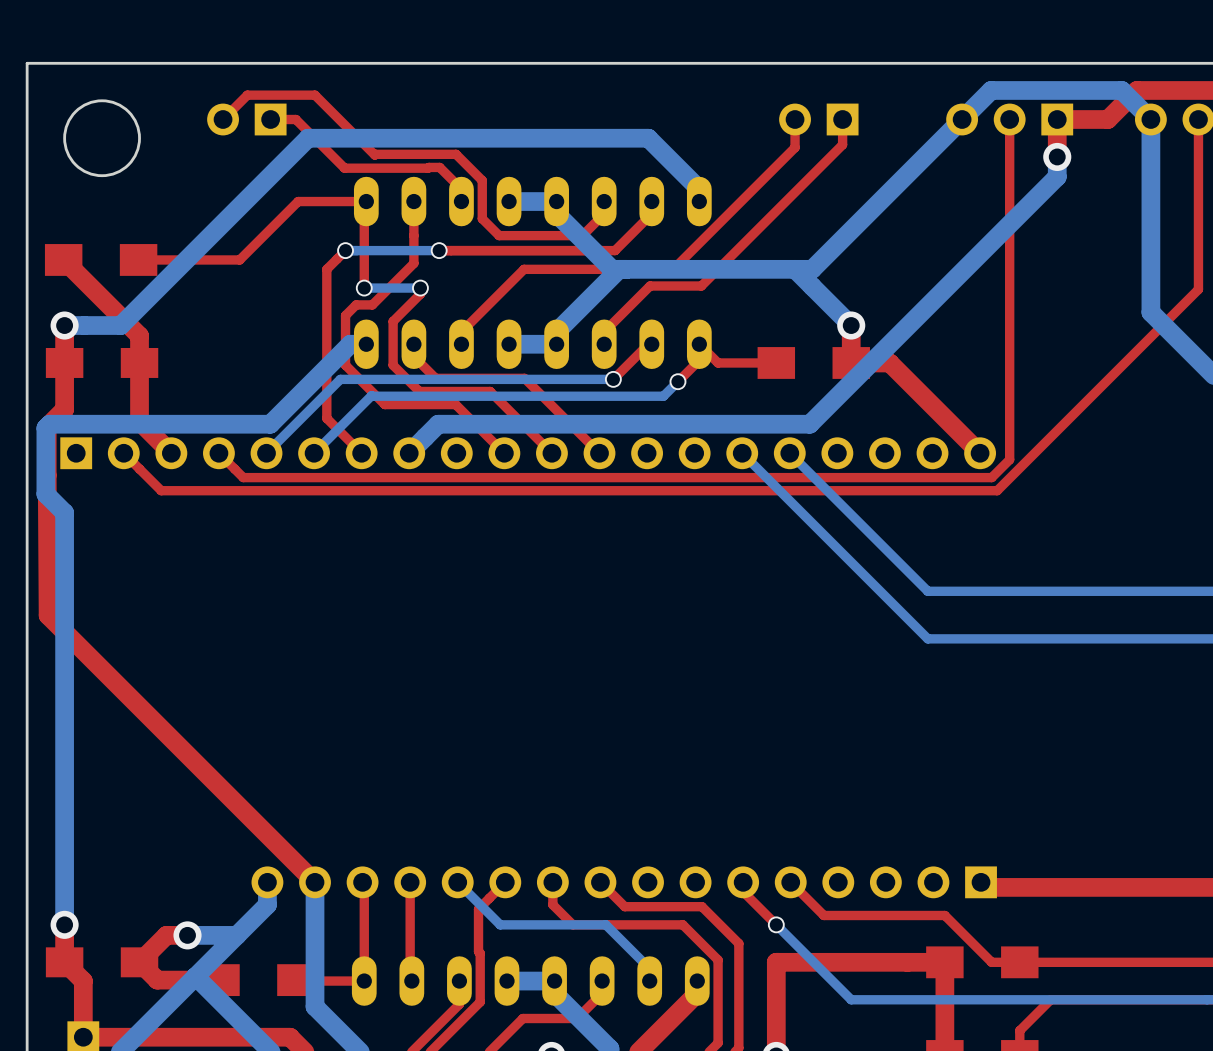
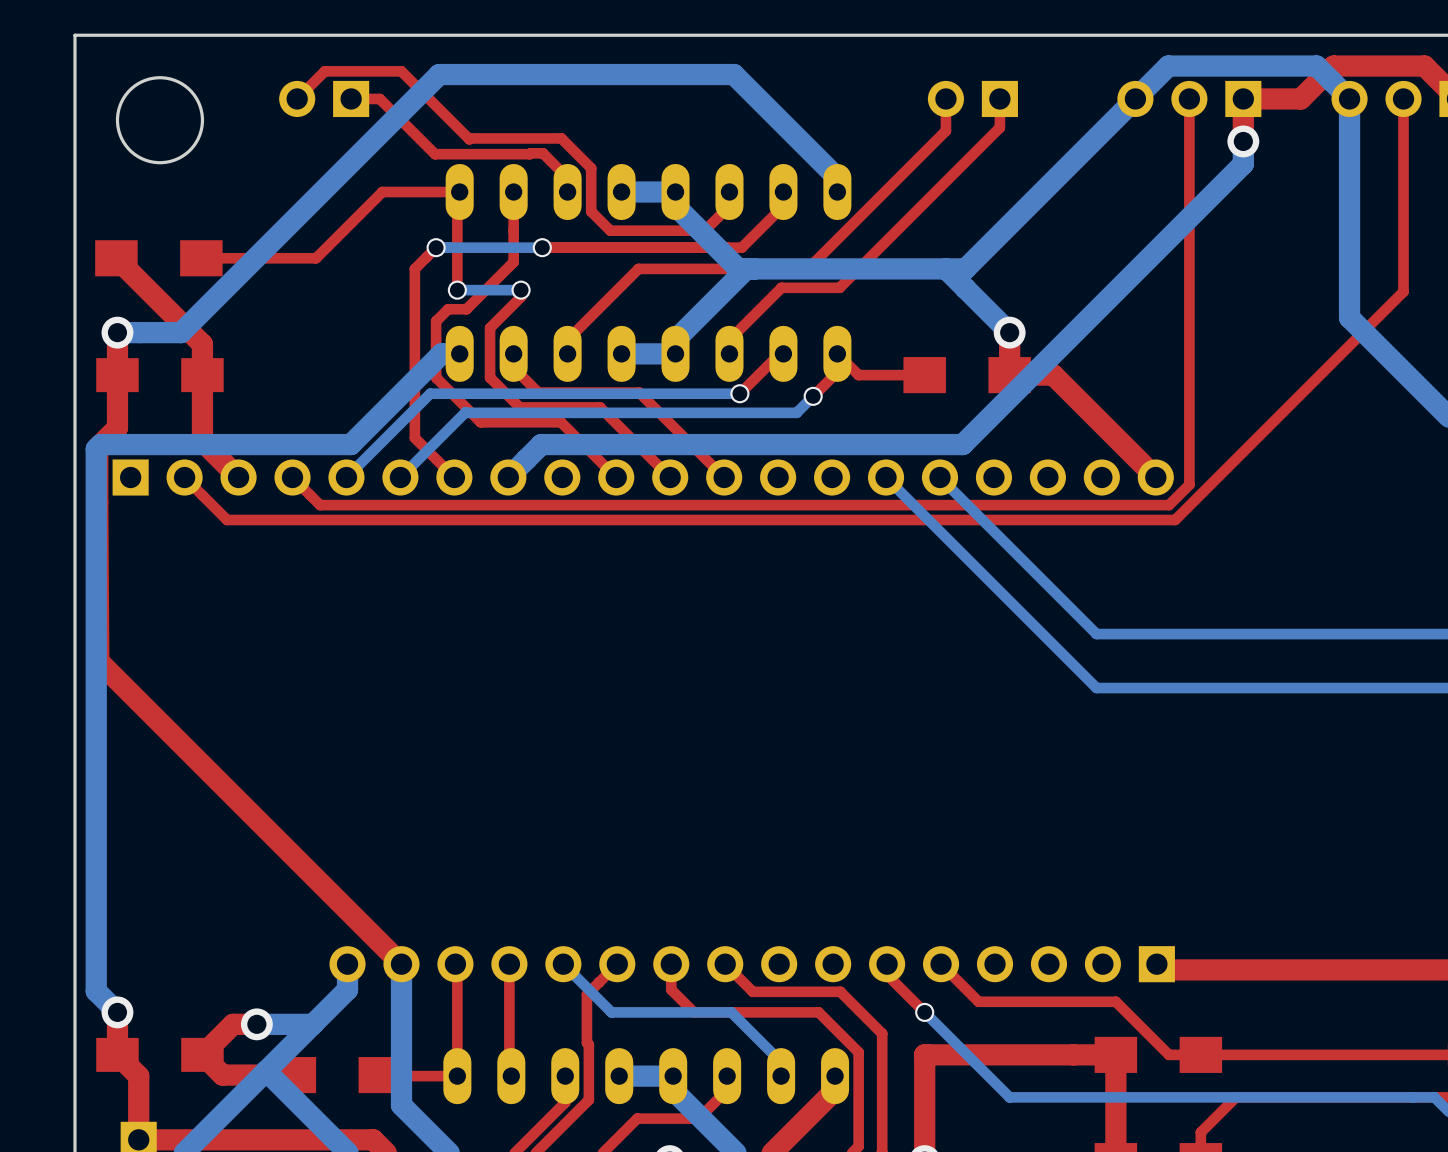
bottom track: (648, 138) (308, 138) -> (779, 120) (733, 74) (439, 74) (393, 120)
bottom track: (45, 494) (64, 512) (64, 924) -> (96, 523) (96, 991) (117, 1012)

